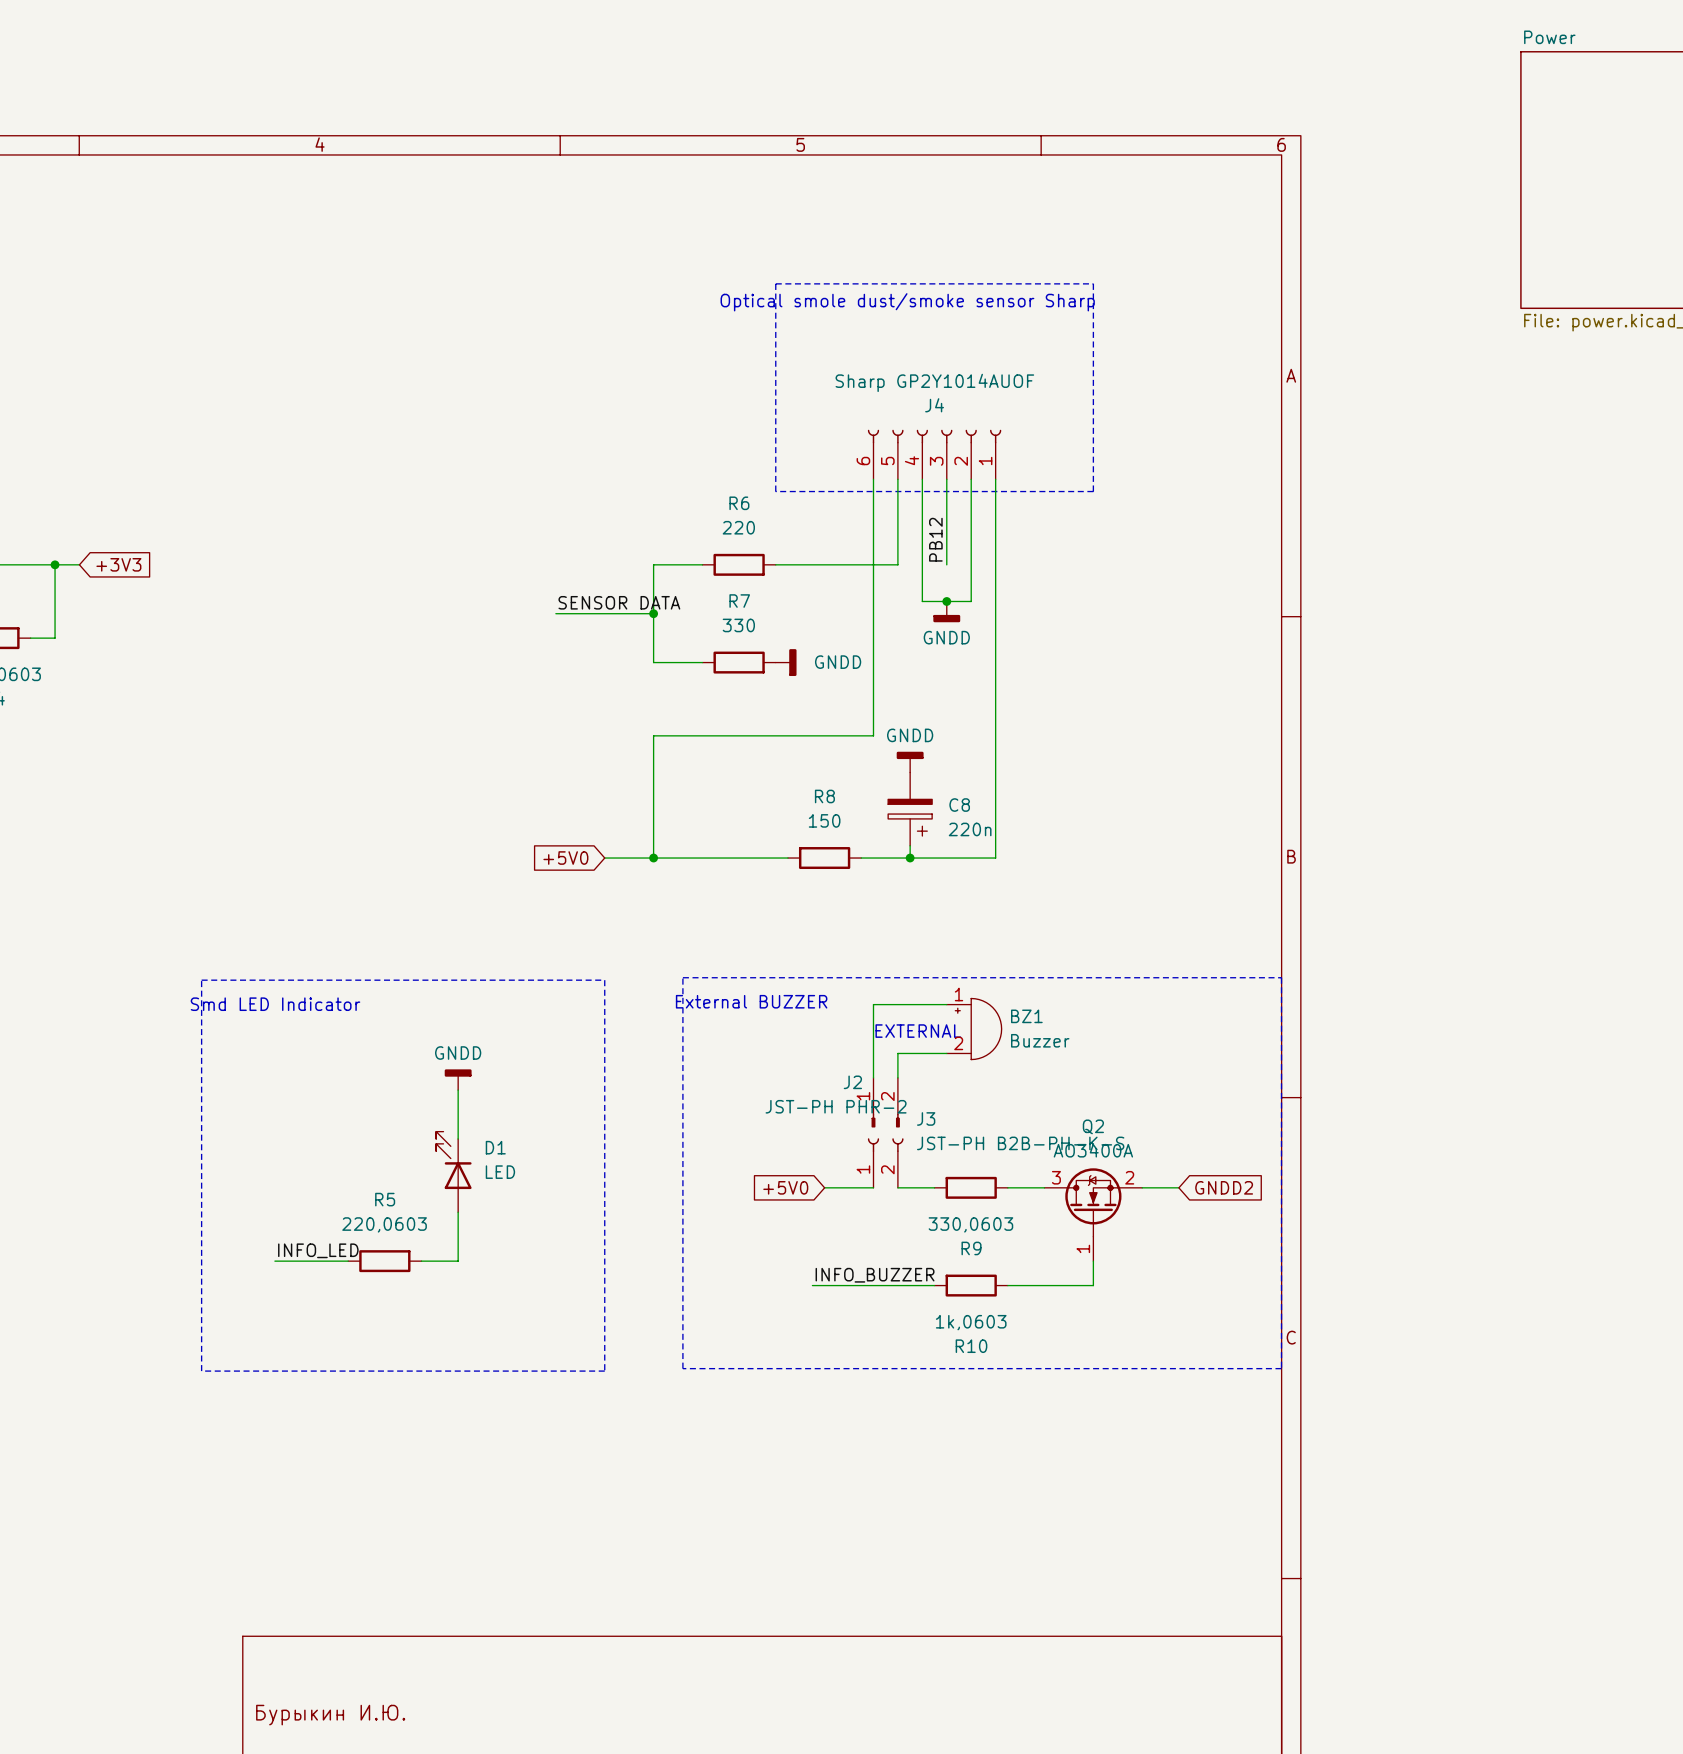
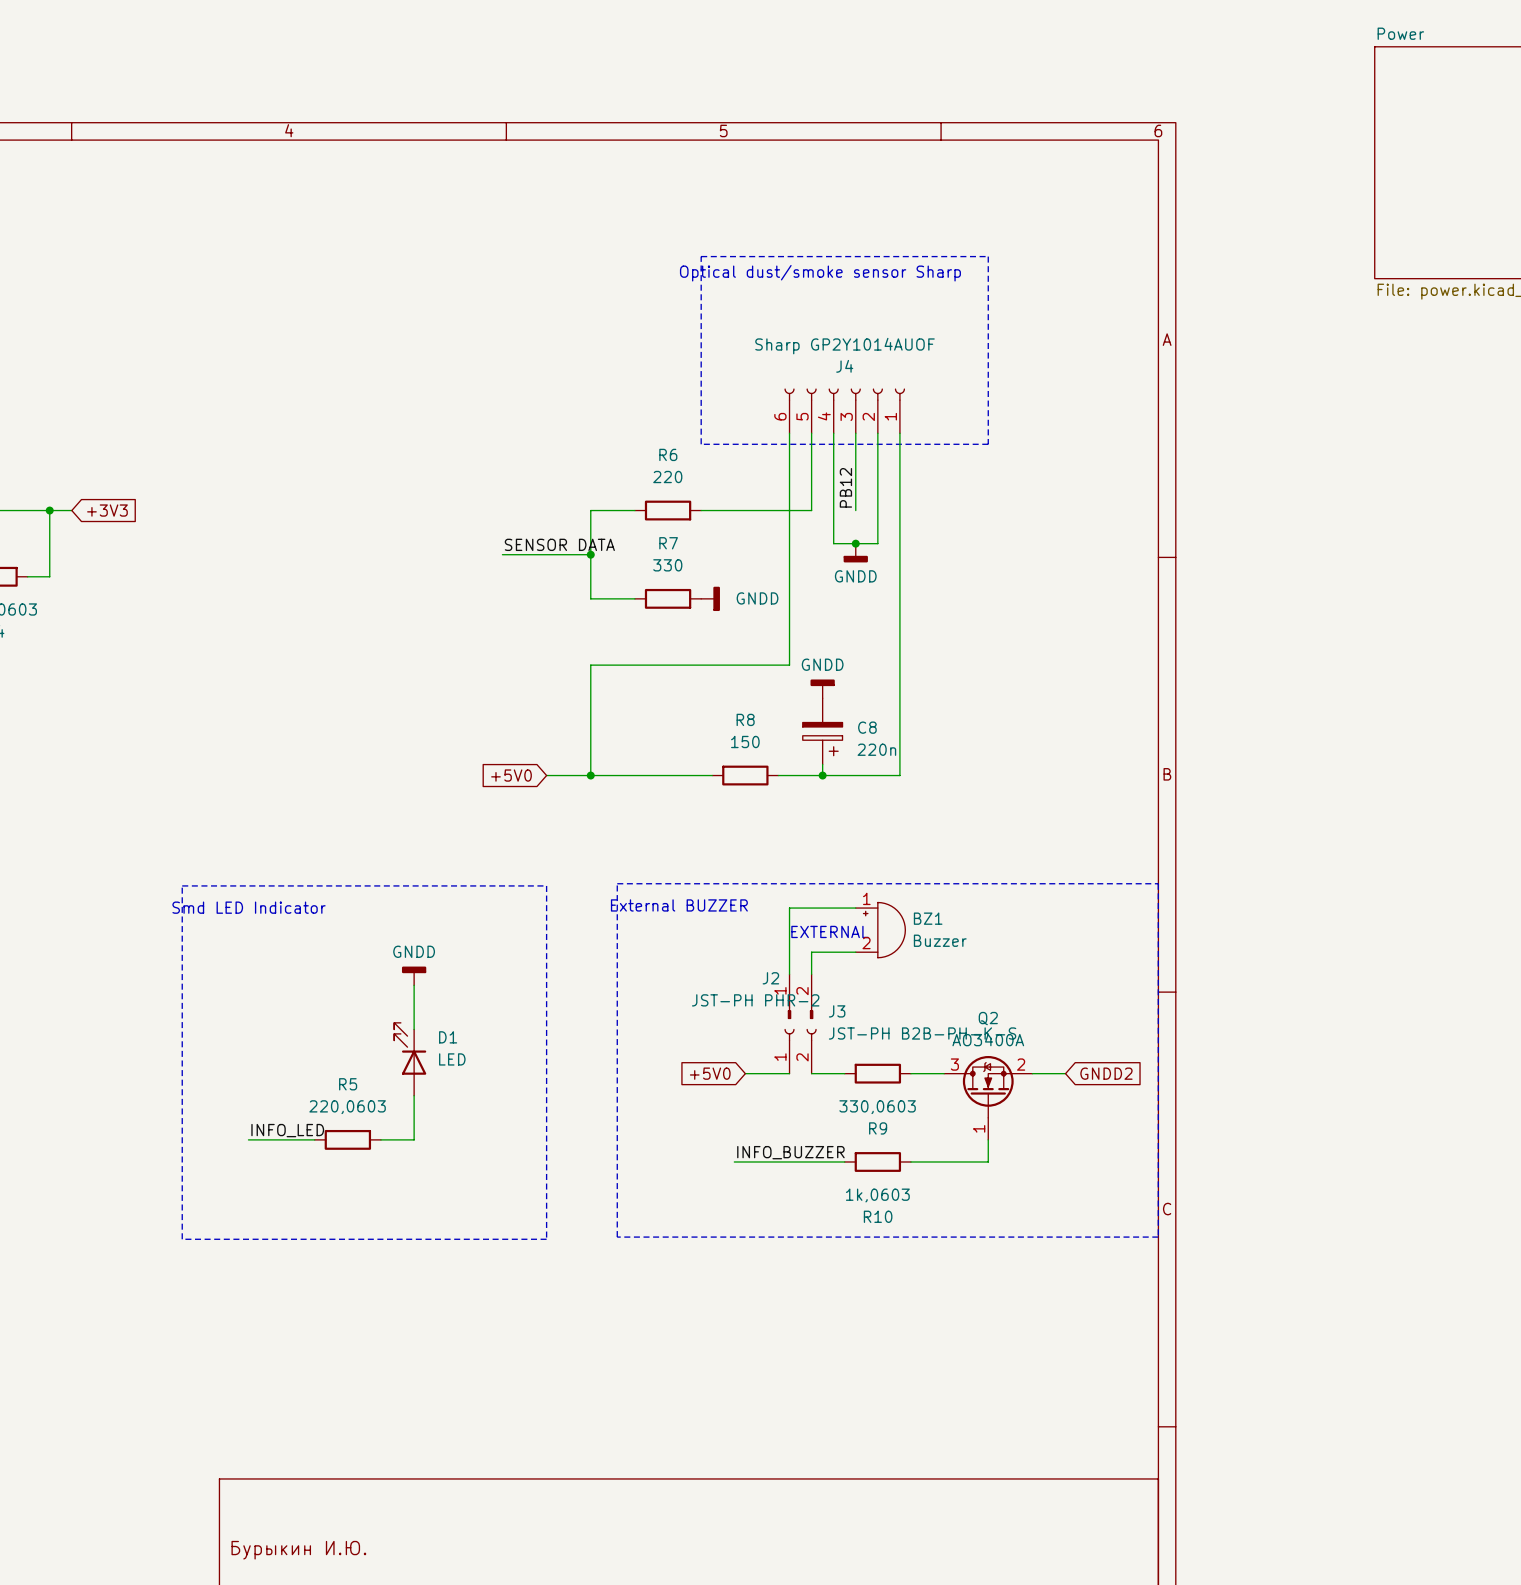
text: Optical smole dust/smoke sensor Sharp (907, 302) -> Optical dust/smoke sensor Sharp (820, 273)

